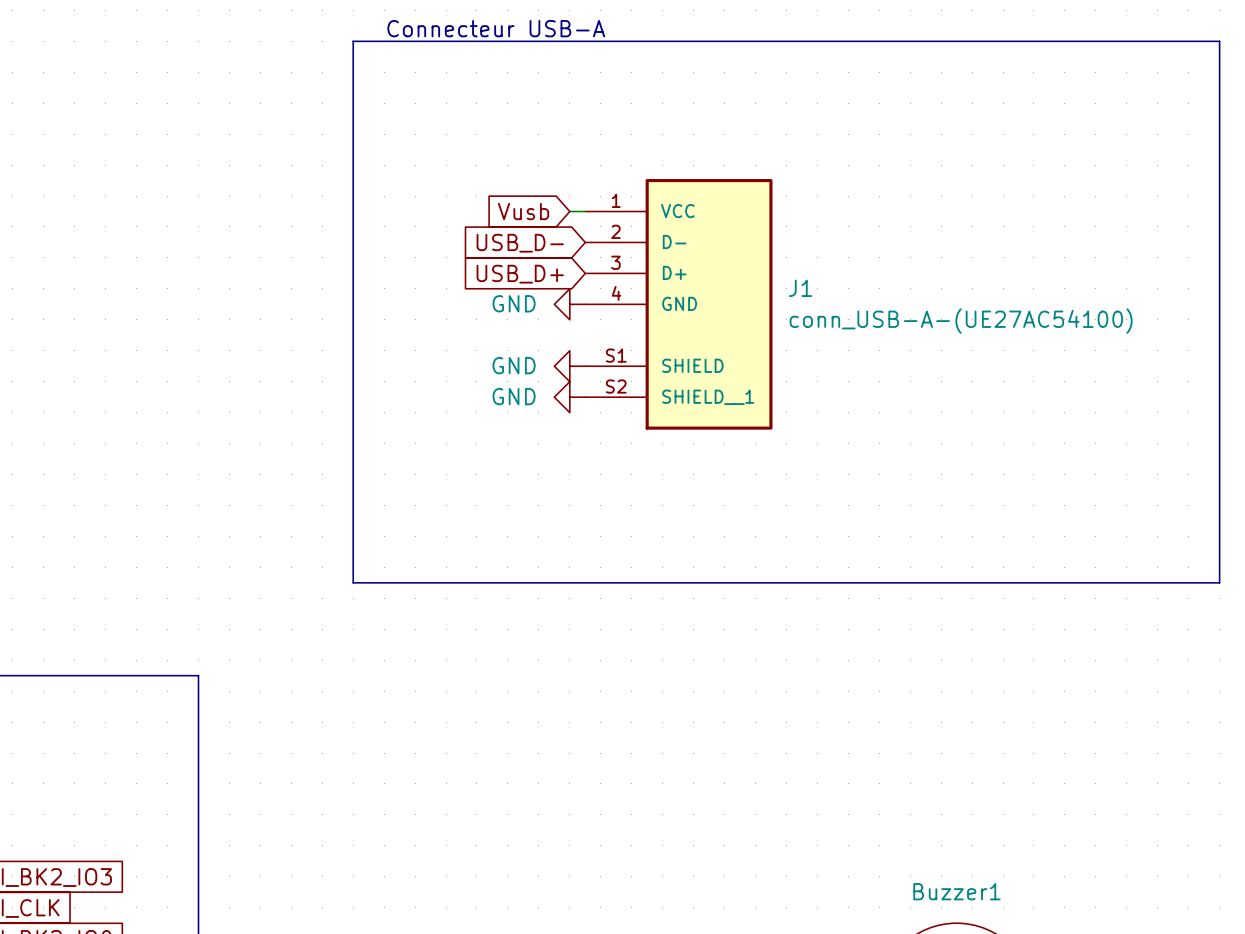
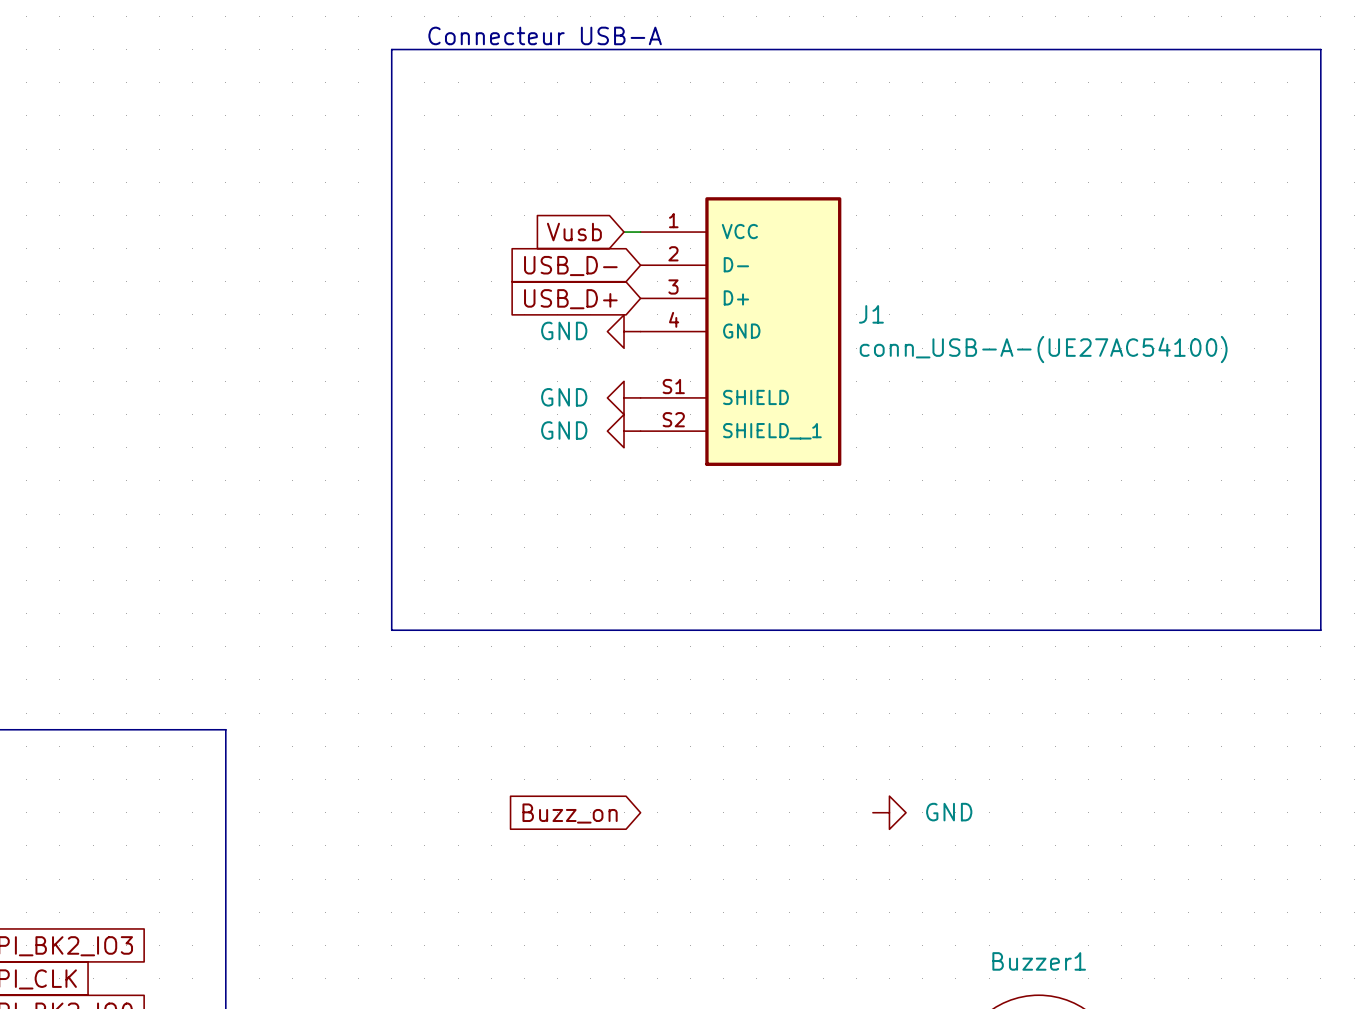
global label: none -> Buzz_on (570, 813)
power symbol: none -> GND (889, 812)

